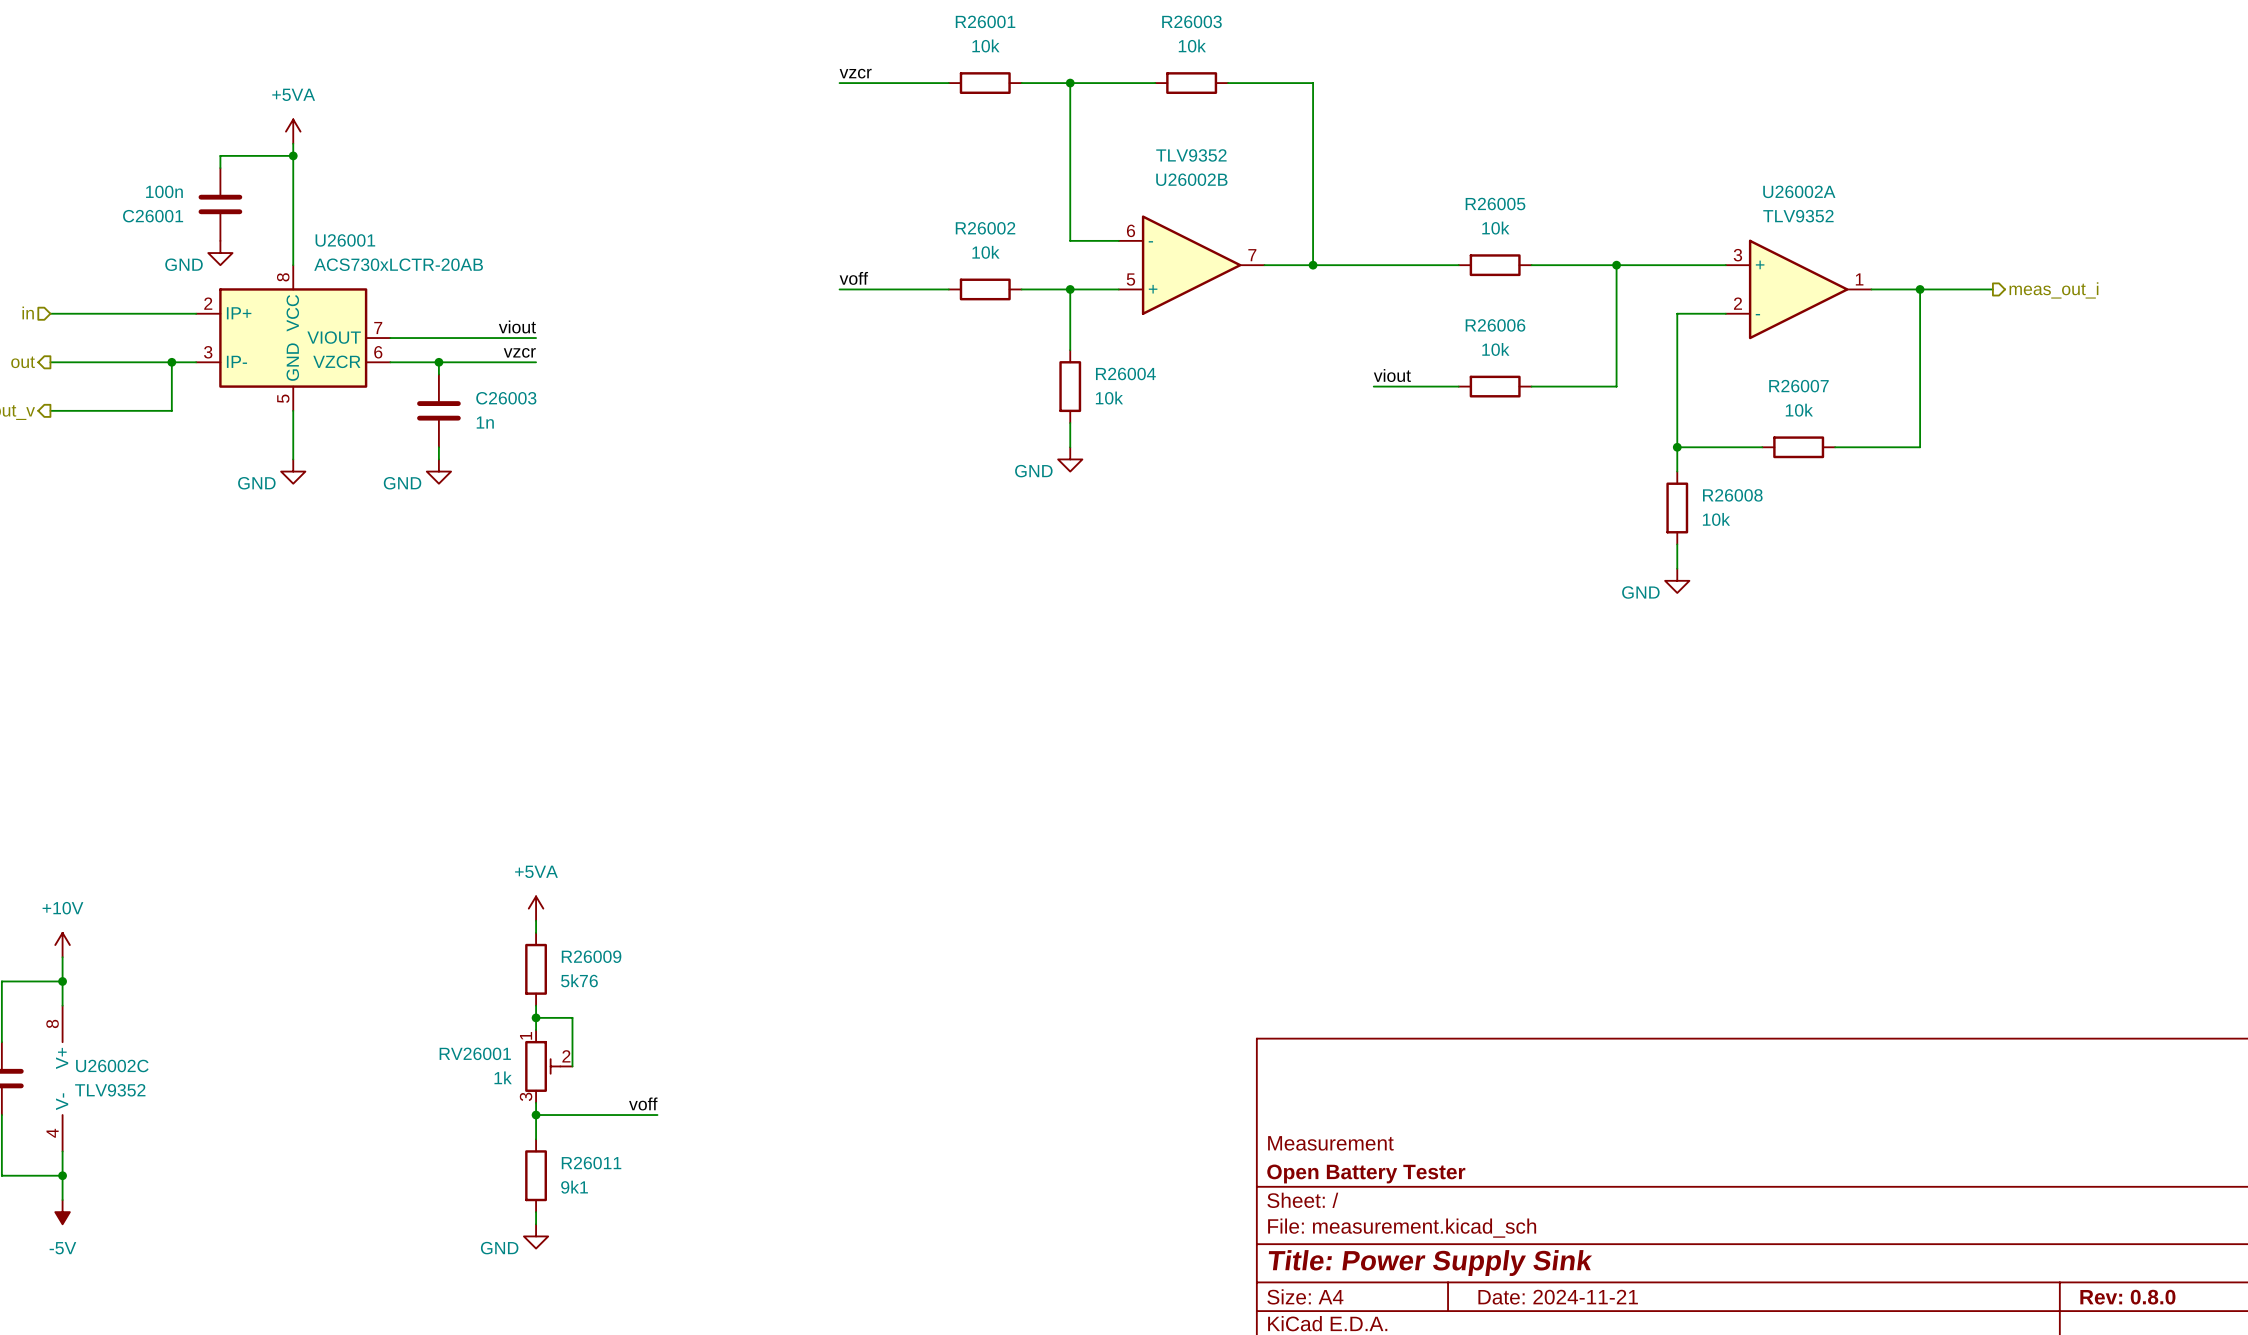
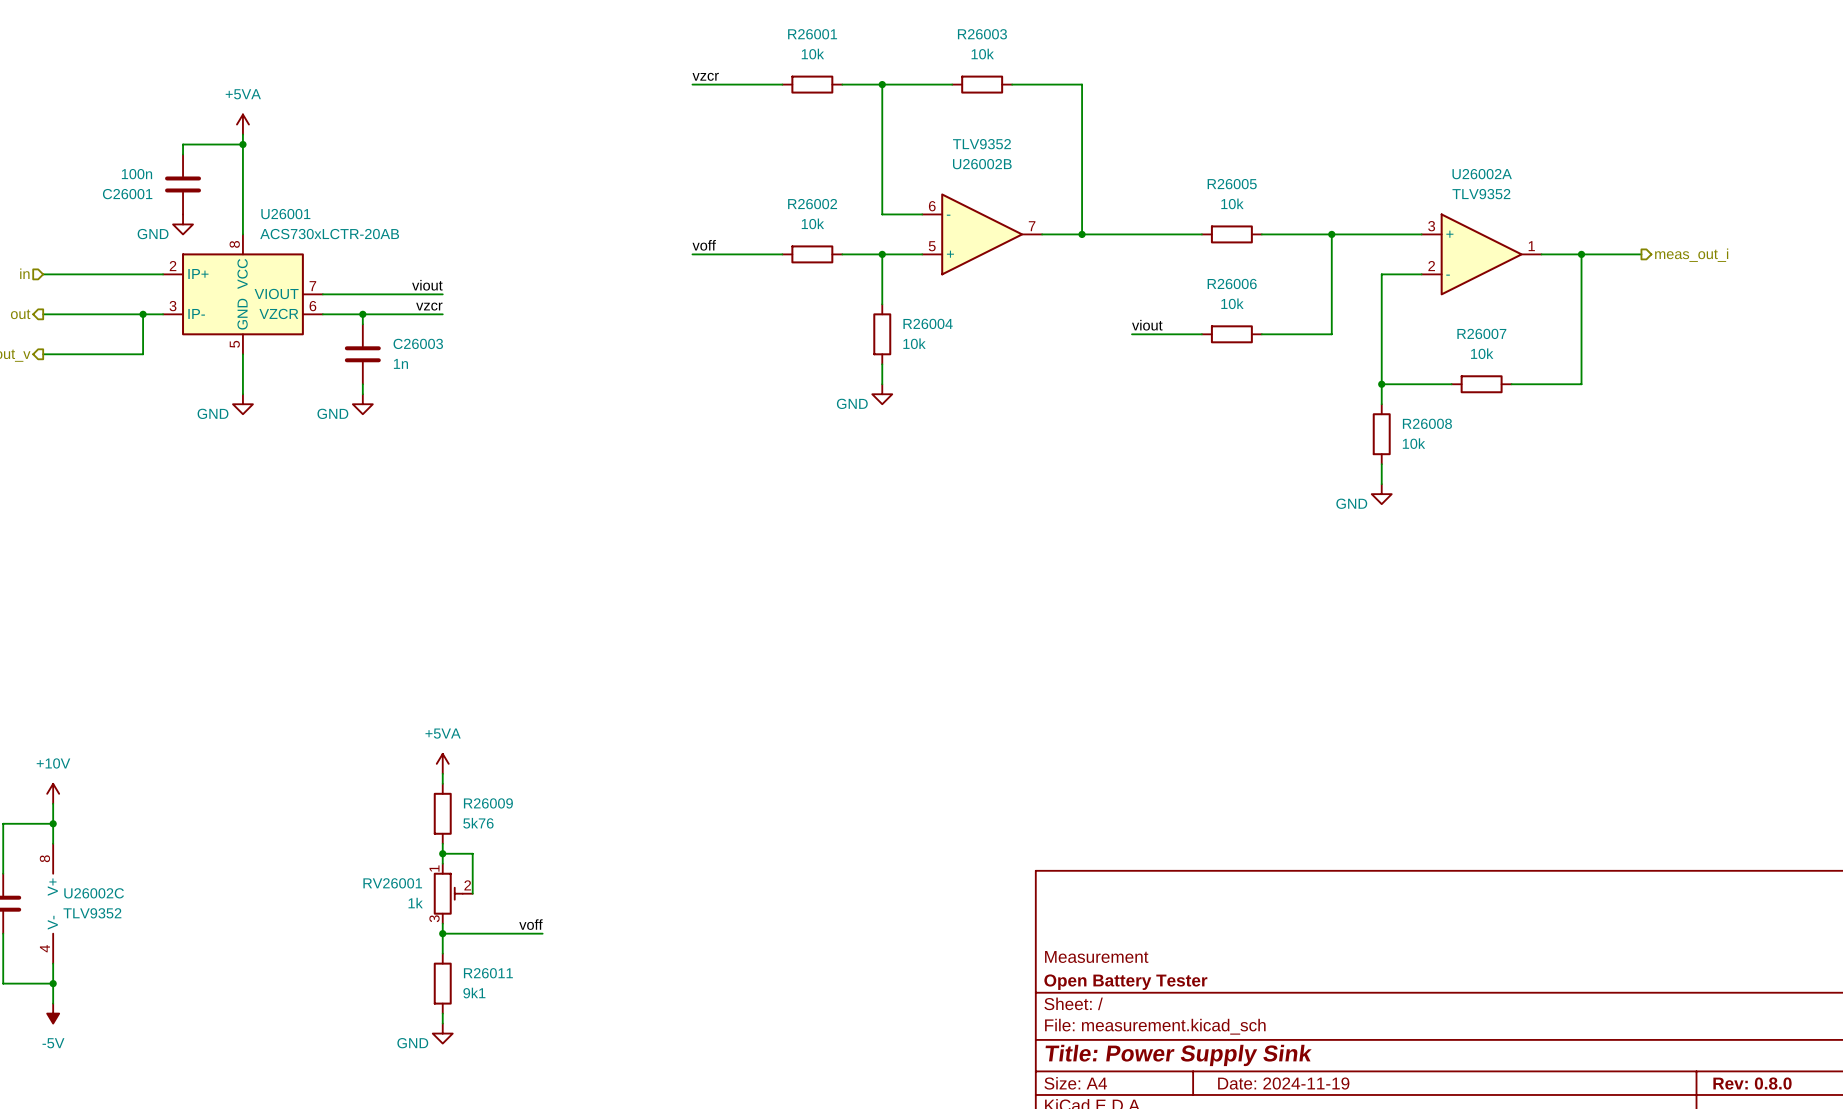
title block: Date: 2024-11-21 (1558, 1297) -> Date: 2024-11-19 (1283, 1083)

